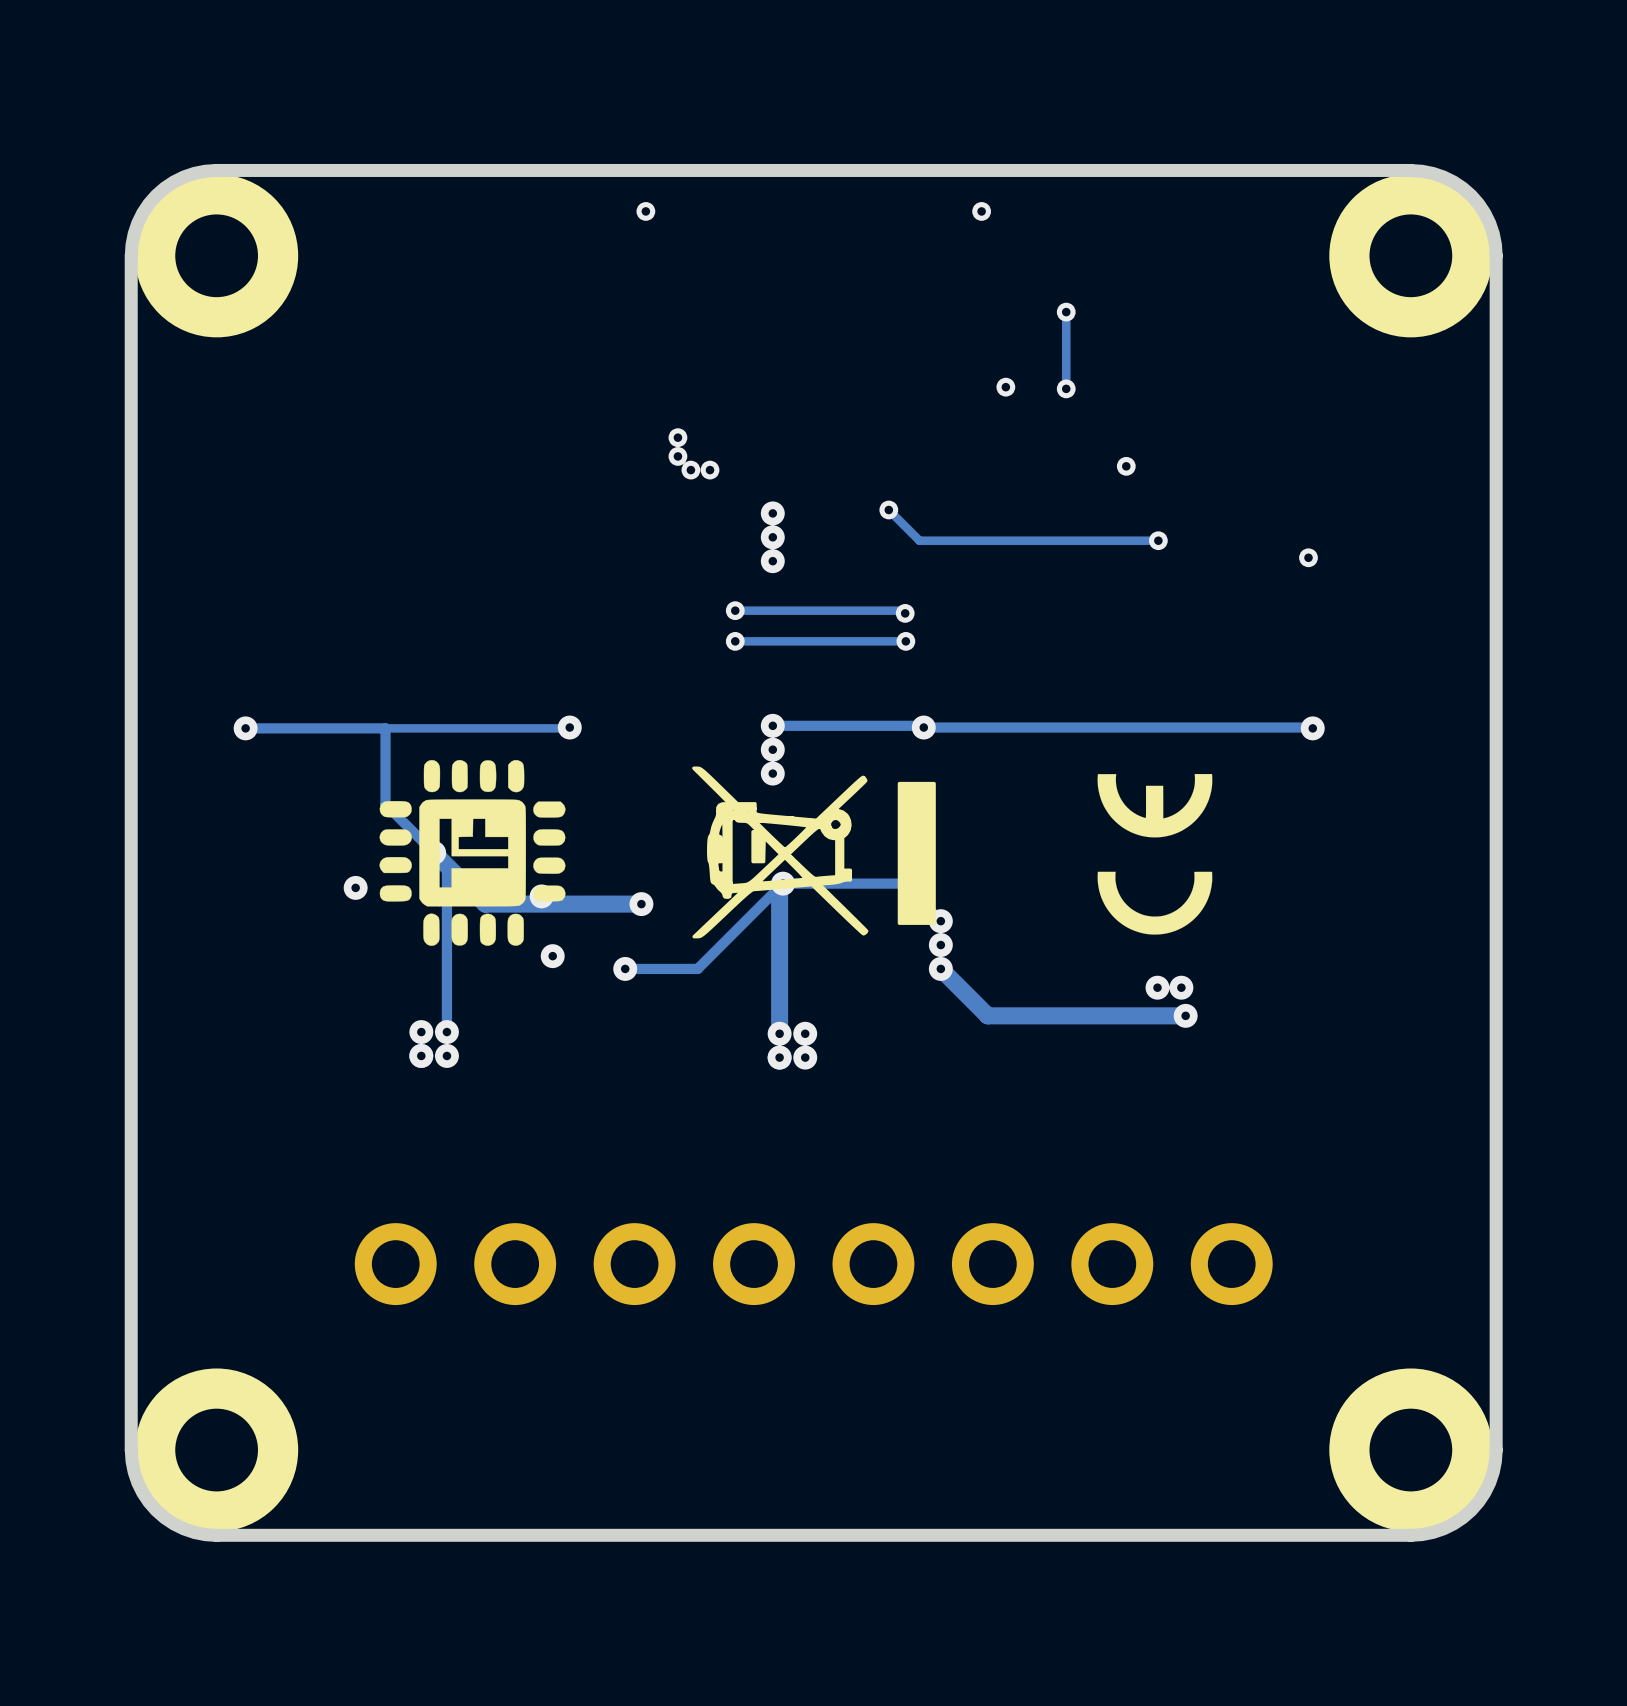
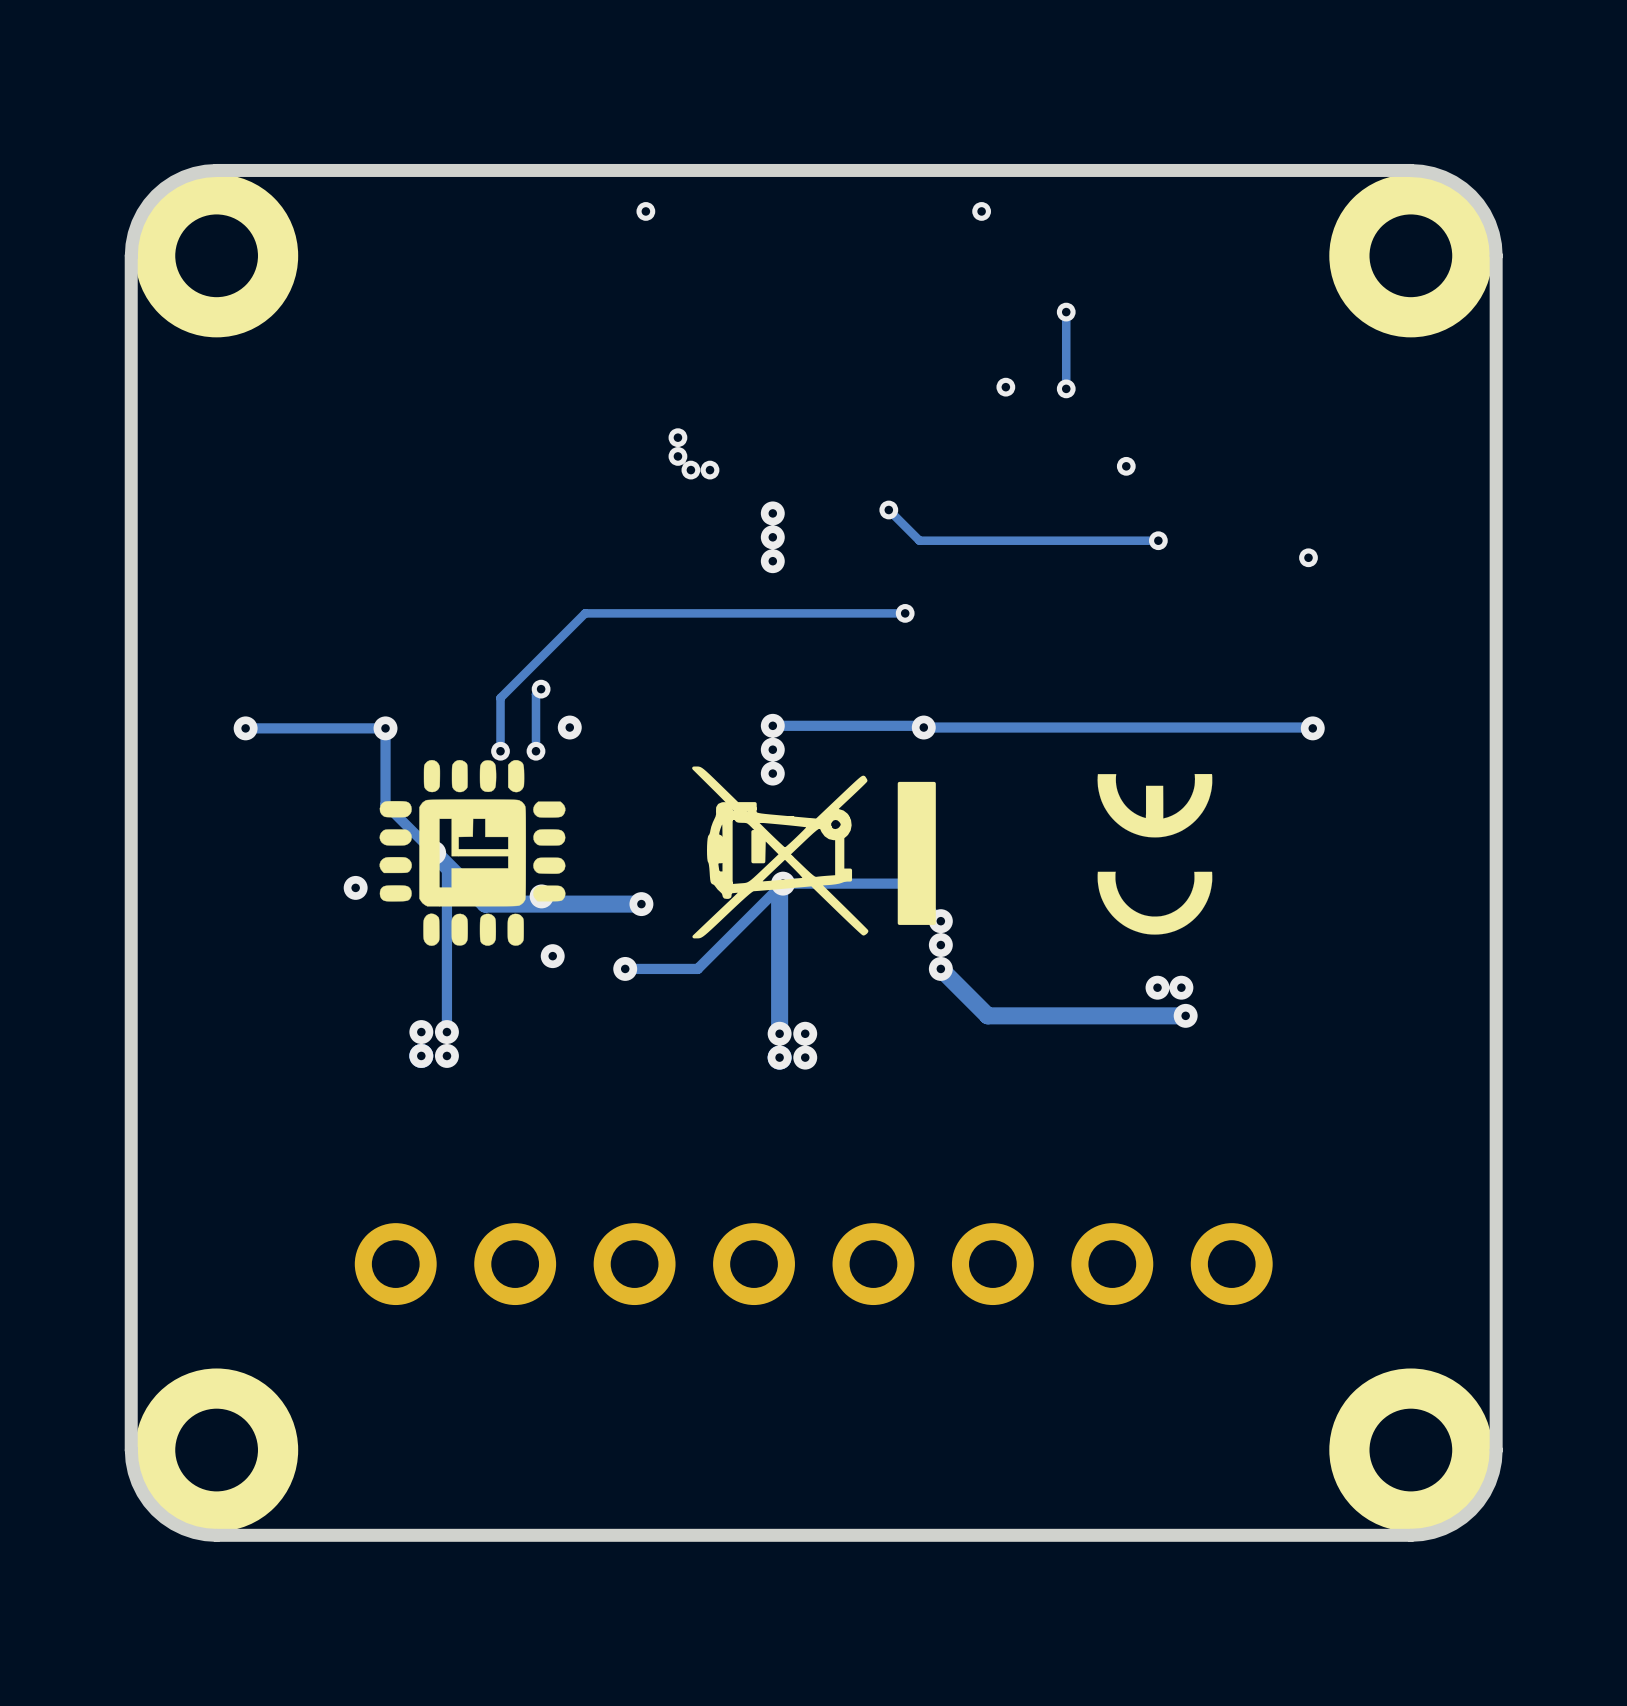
track: (735, 610) (902, 610) (905, 613) -> (500, 751) (500, 698) (585, 613) (905, 613)
via: (735, 610) -> none
via: (735, 641) -> none
track: (905, 641) (735, 641) -> none
via: (905, 641) -> none
track: none -> (541, 689) (535, 694) (535, 751)
via: none -> (541, 689)
track: (569, 727) (385, 728) -> none
via: none -> (385, 728)
via: none -> (500, 751)
via: none -> (535, 751)

